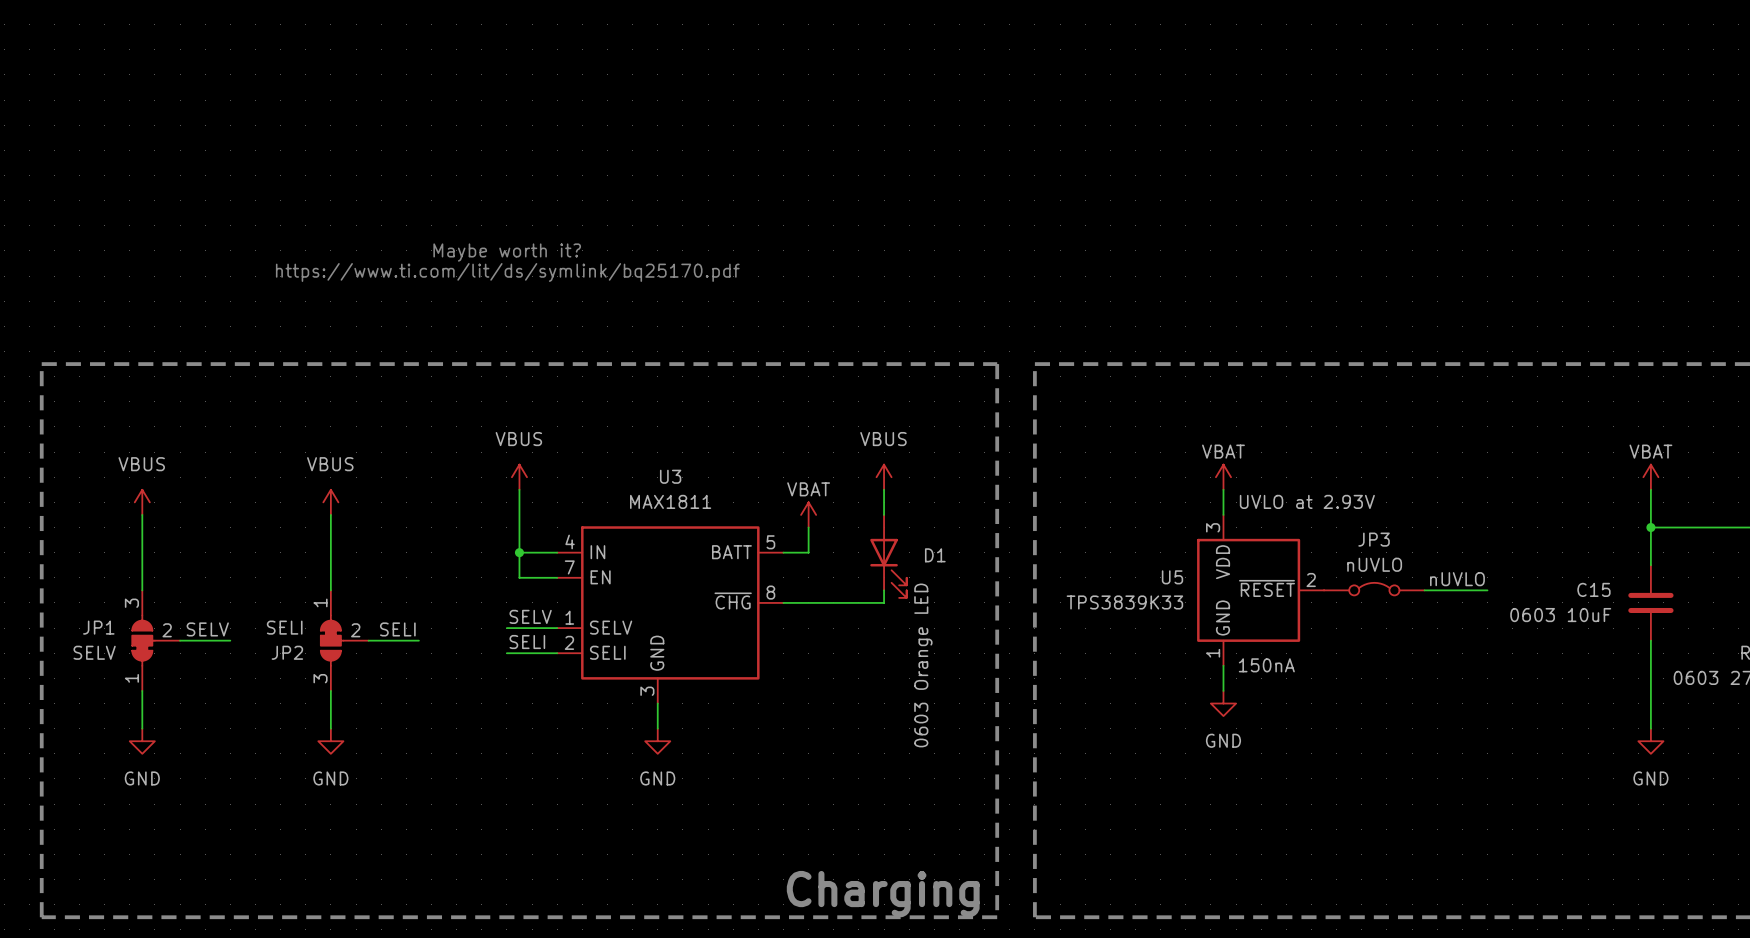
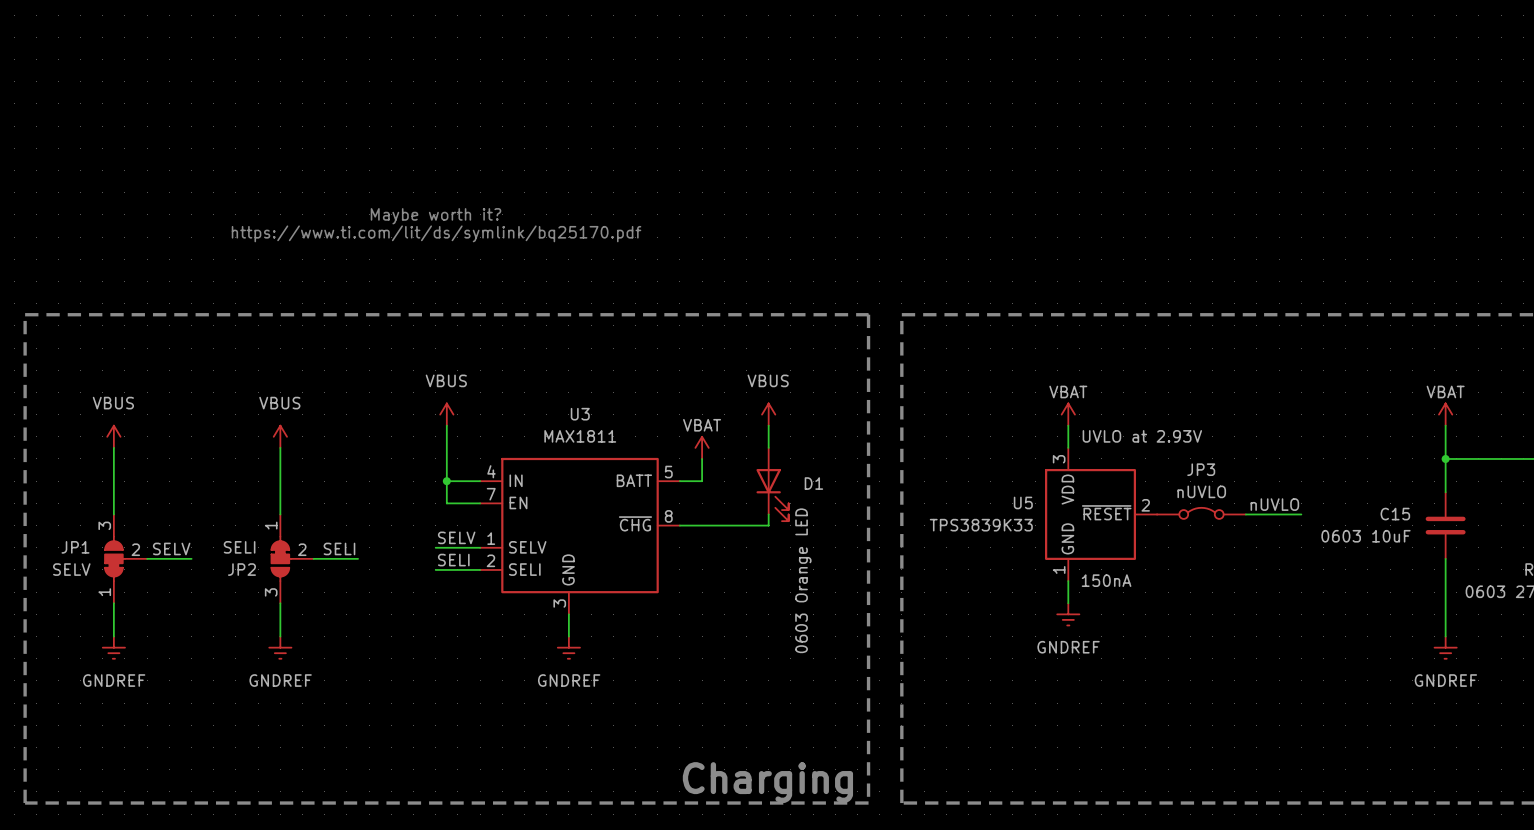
power symbol: GND (1223, 703) -> GNDREF (1068, 614)
power symbol: GND (142, 741) -> GNDREF (113, 647)
power symbol: GND (330, 741) -> GNDREF (280, 647)
power symbol: GND (657, 741) -> GNDREF (568, 647)
power symbol: GND (1650, 741) -> GNDREF (1445, 647)

